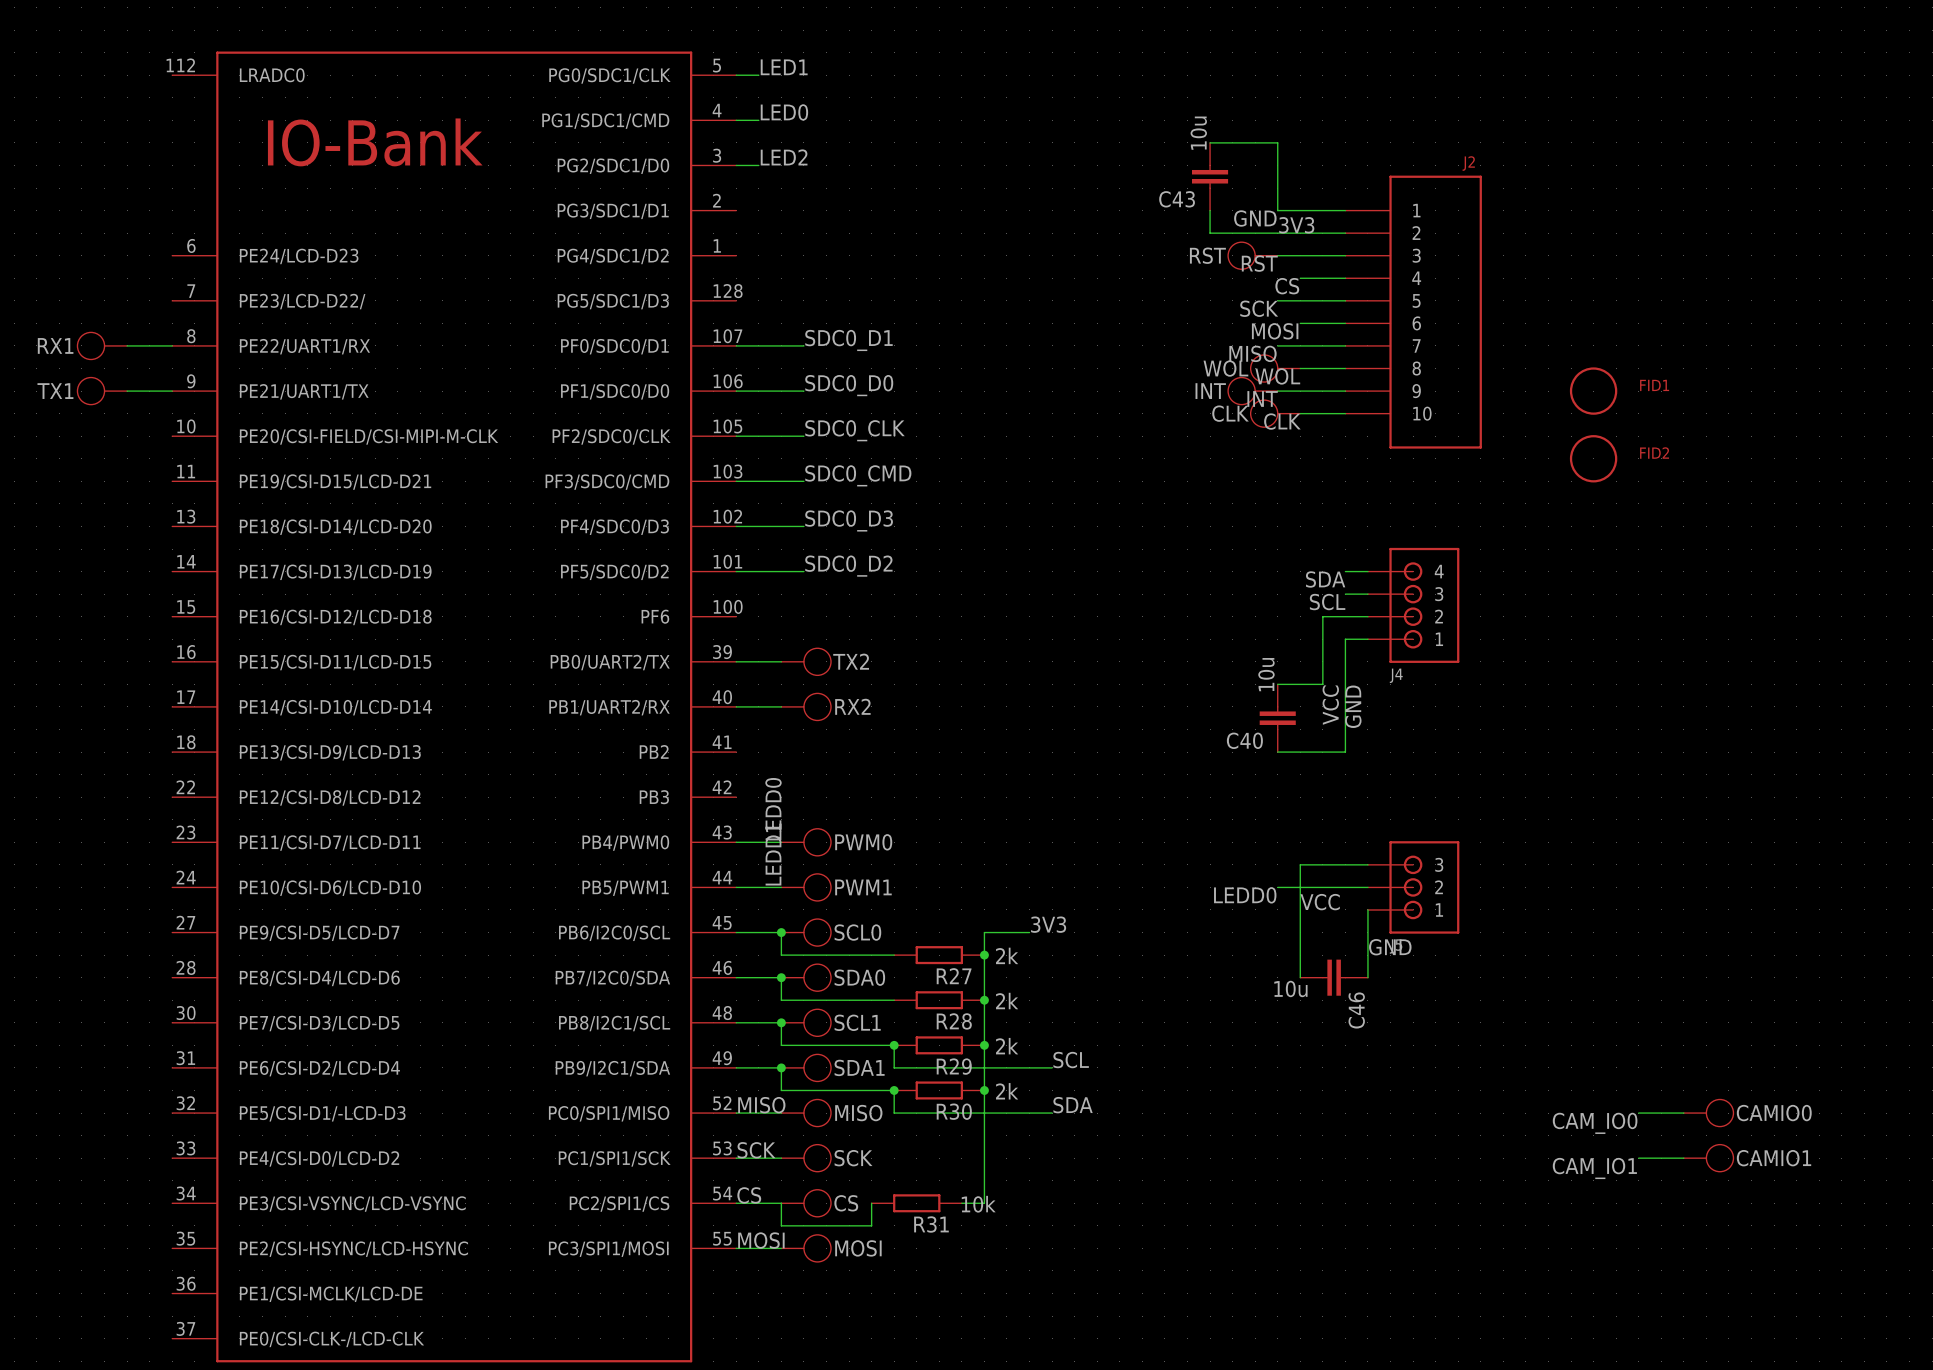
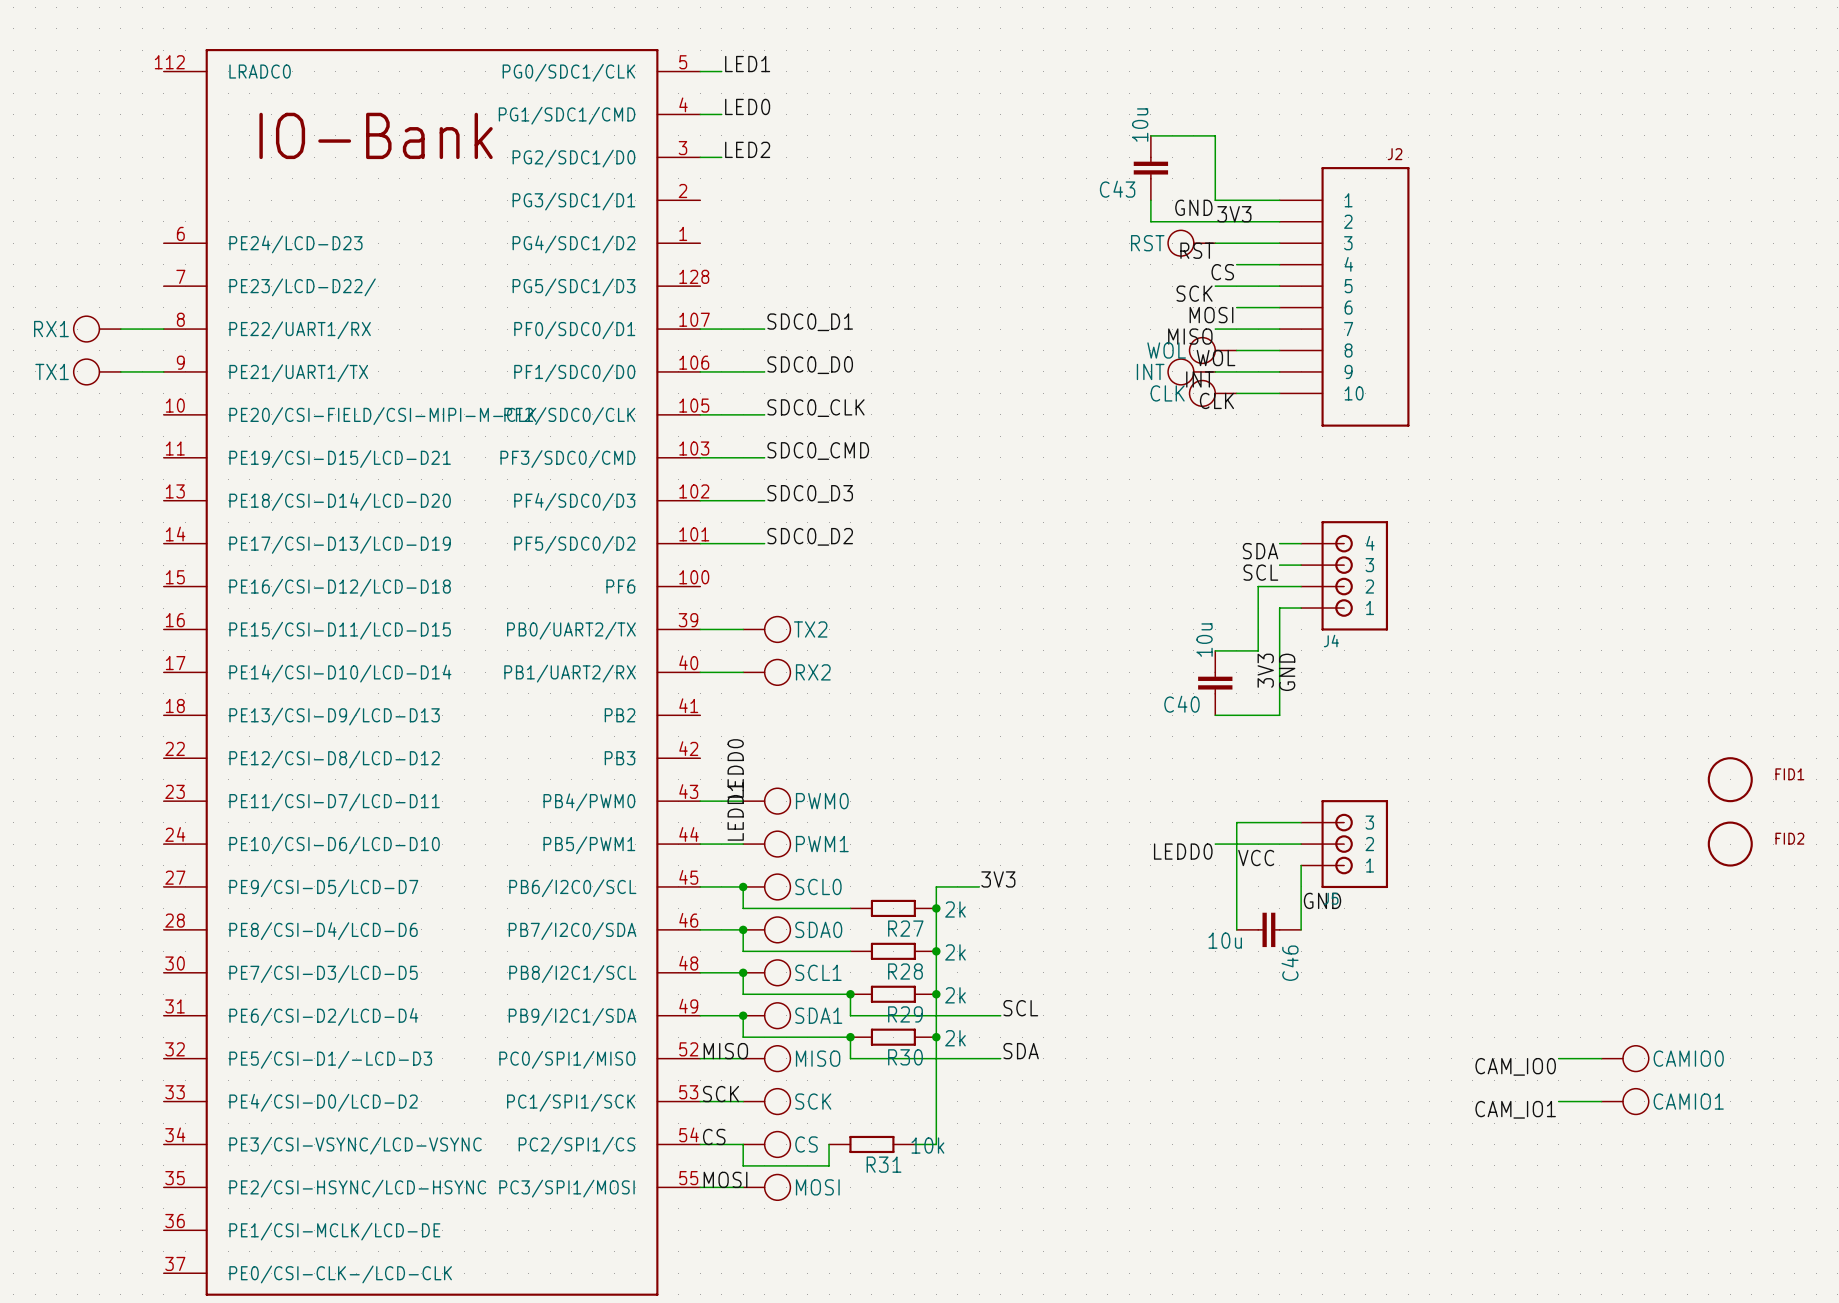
FID1 position: (1593, 391) -> (1730, 779)
FID2 position: (1593, 458) -> (1730, 844)
label: VCC (1330, 705) -> 3V3 (1265, 670)

